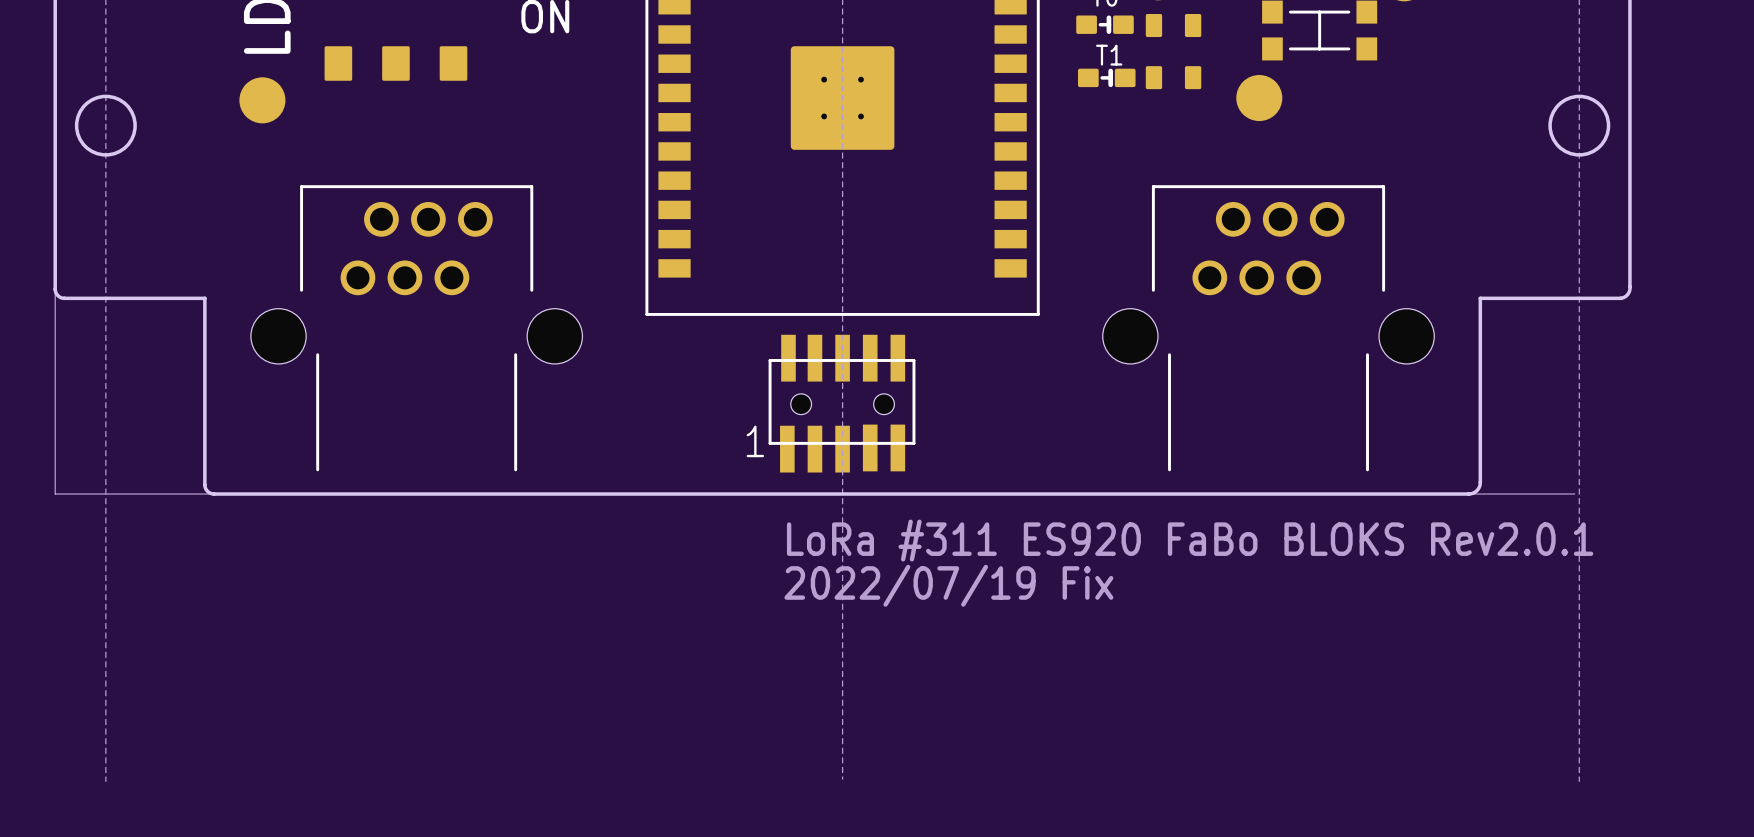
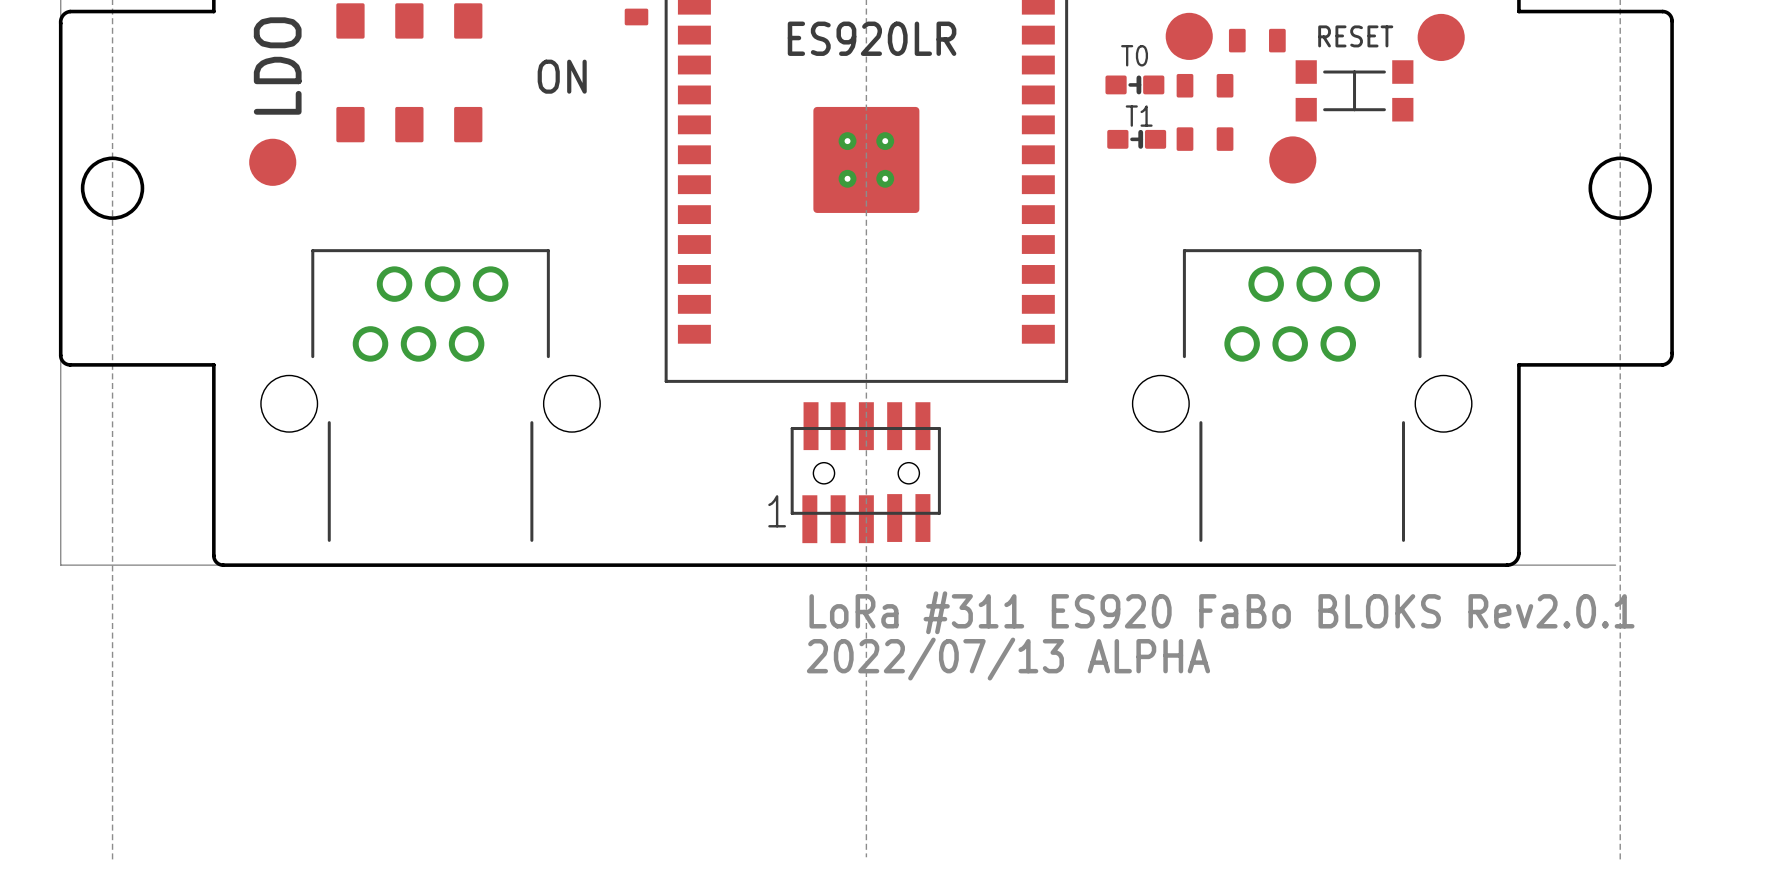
text: 2022/07/19 Fix (948, 585) -> 2022/07/13 ALPHA (1008, 659)

